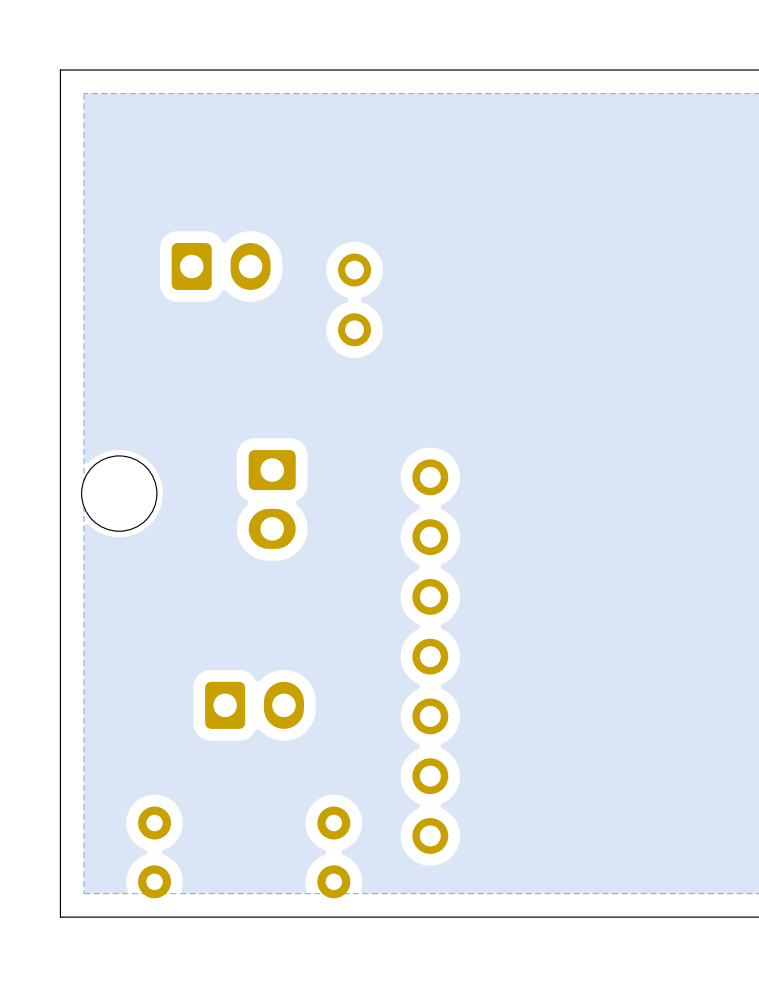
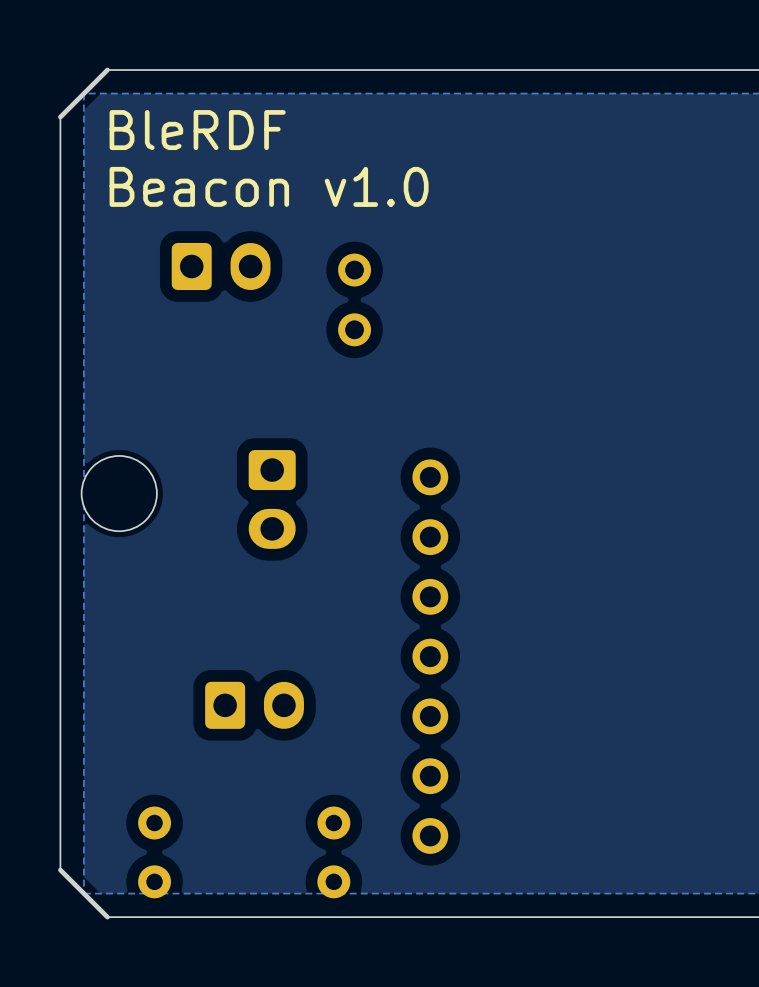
board edge: (107, 70) (60, 70) (60, 117) -> (107, 70) (60, 117)
text: none -> BleRDF (197, 130)
text: none -> Beacon v1.0 (269, 186)
board edge: (60, 870) (60, 917) (107, 917) -> (60, 870) (107, 917)

